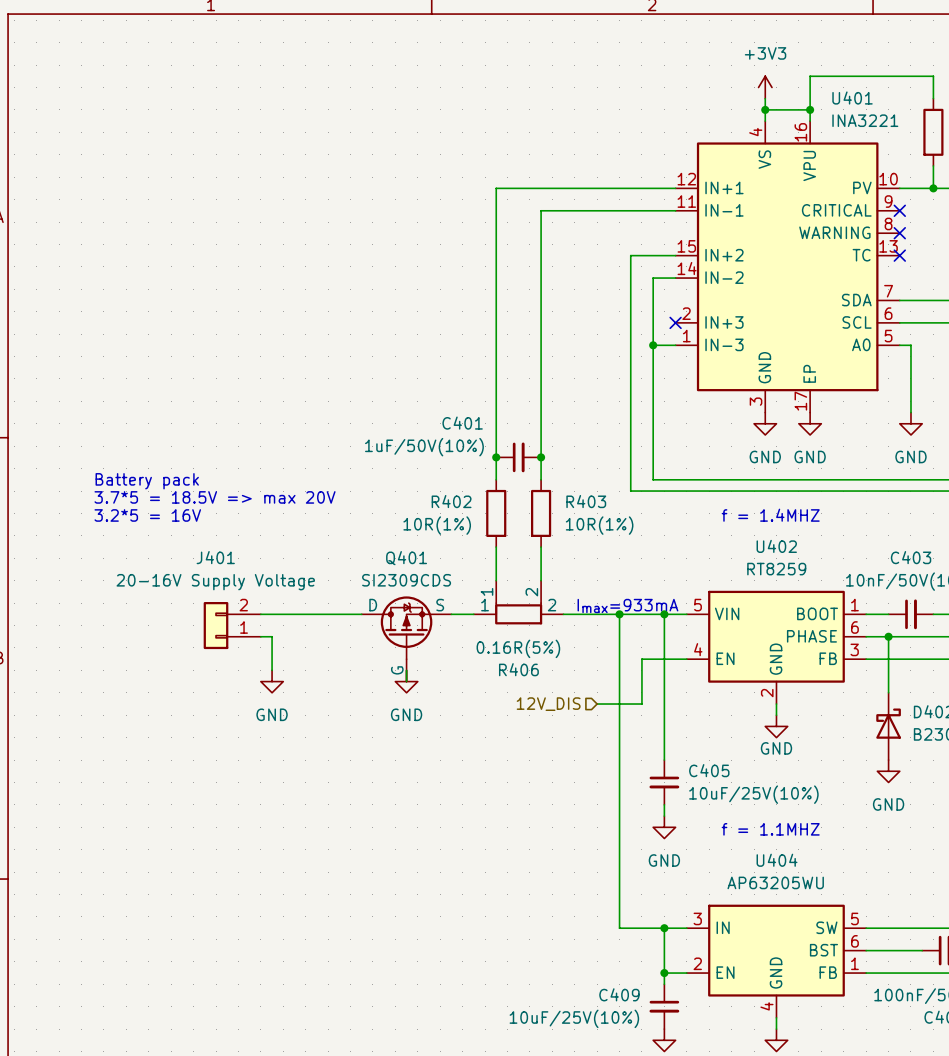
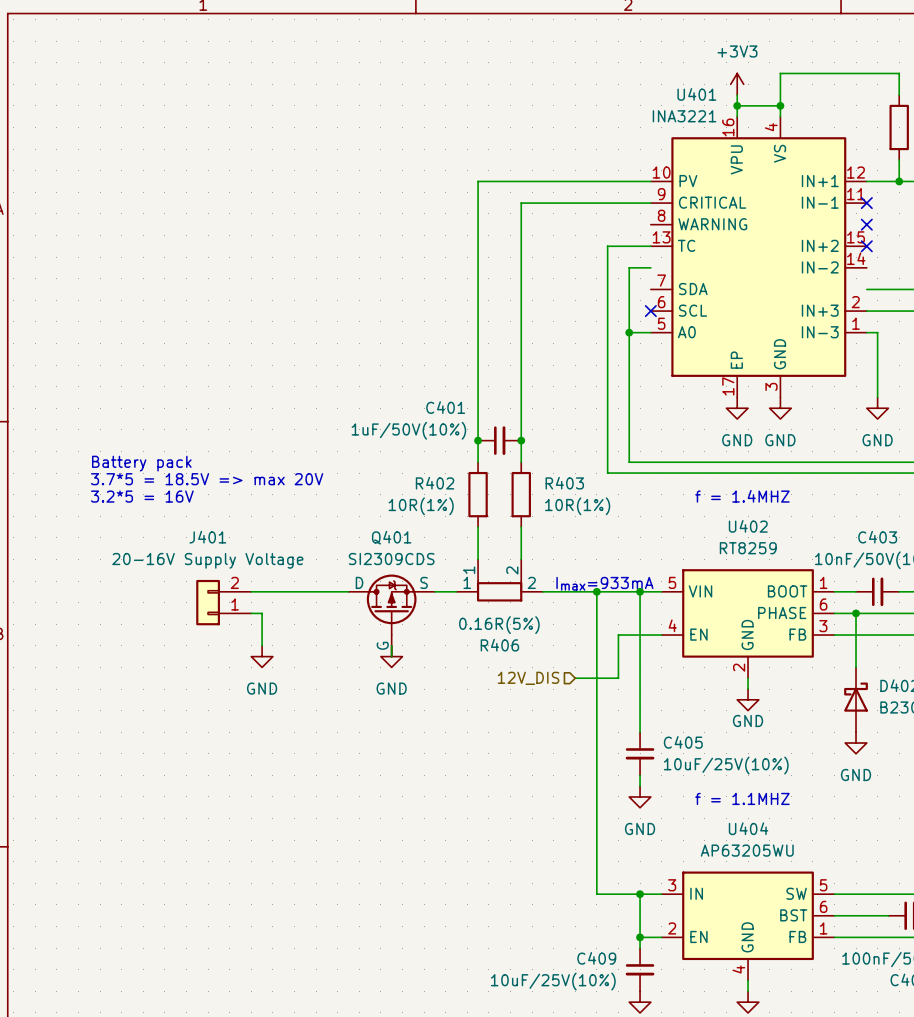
U401 flip: as is (787, 266) -> left-right (758, 257)

